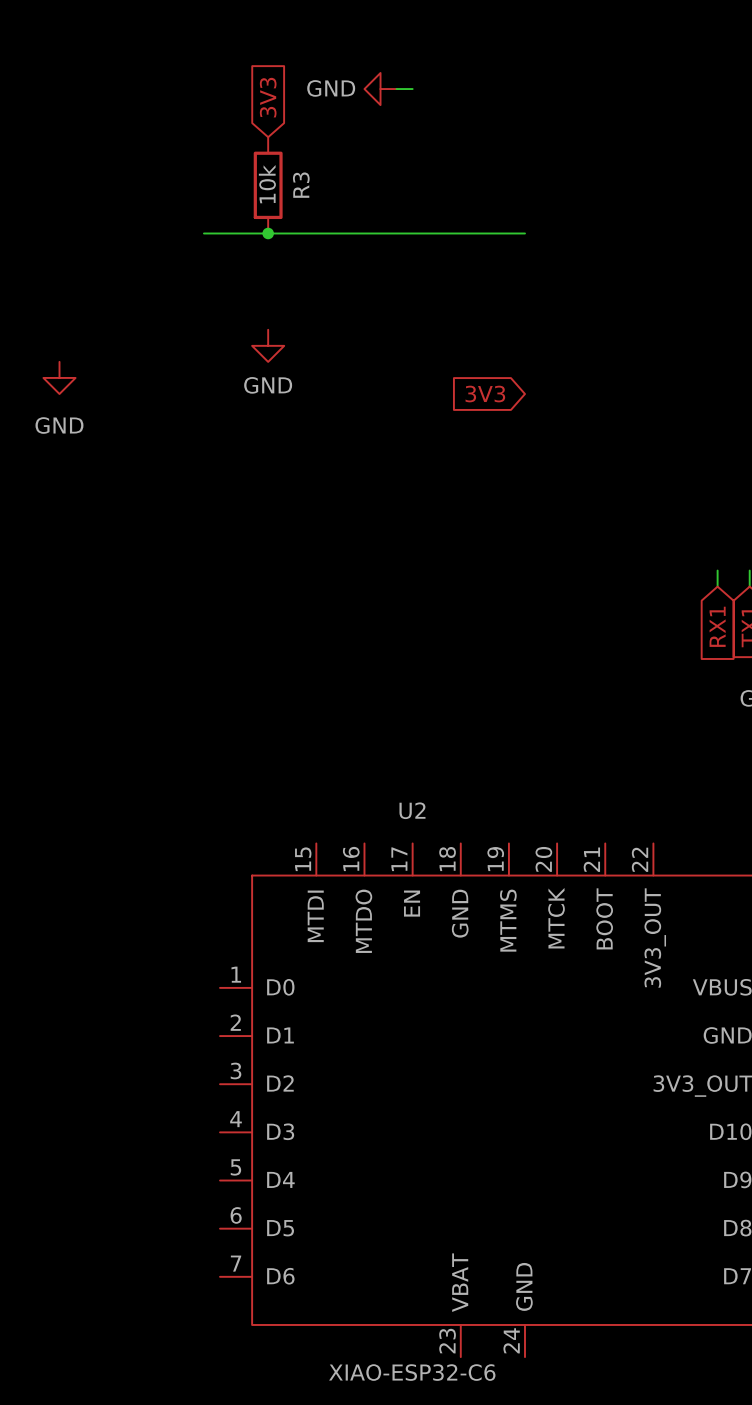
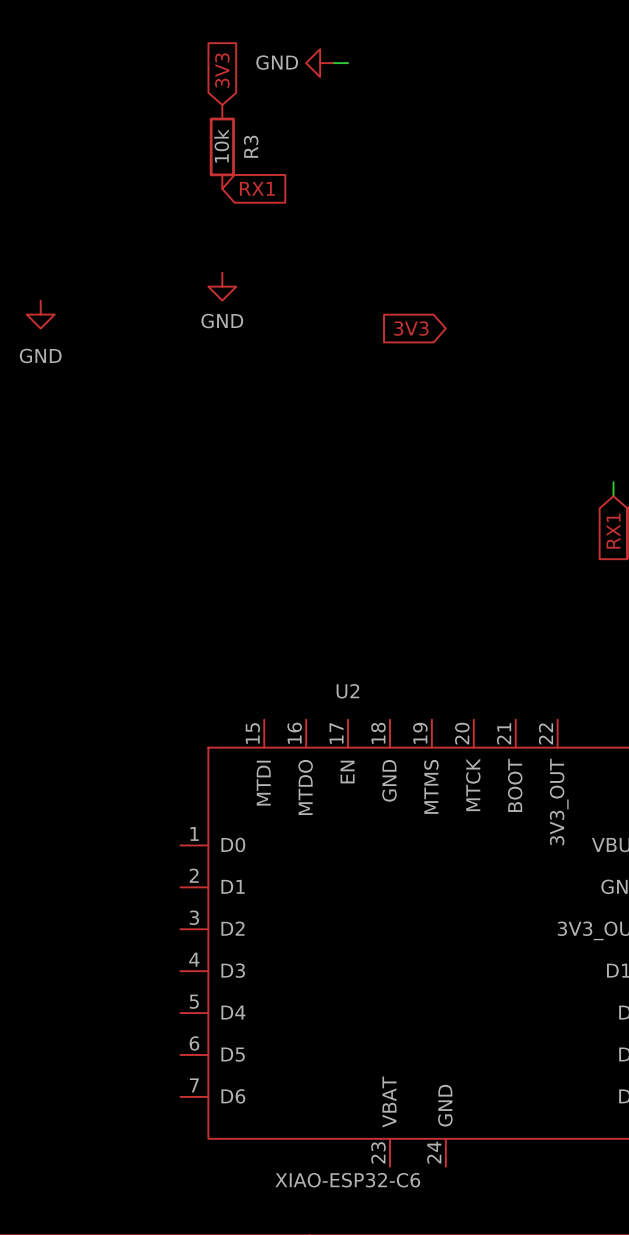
wire: (203, 233) (524, 233) -> none
junction: (268, 233) -> none
global label: none -> RX1 (257, 188)

